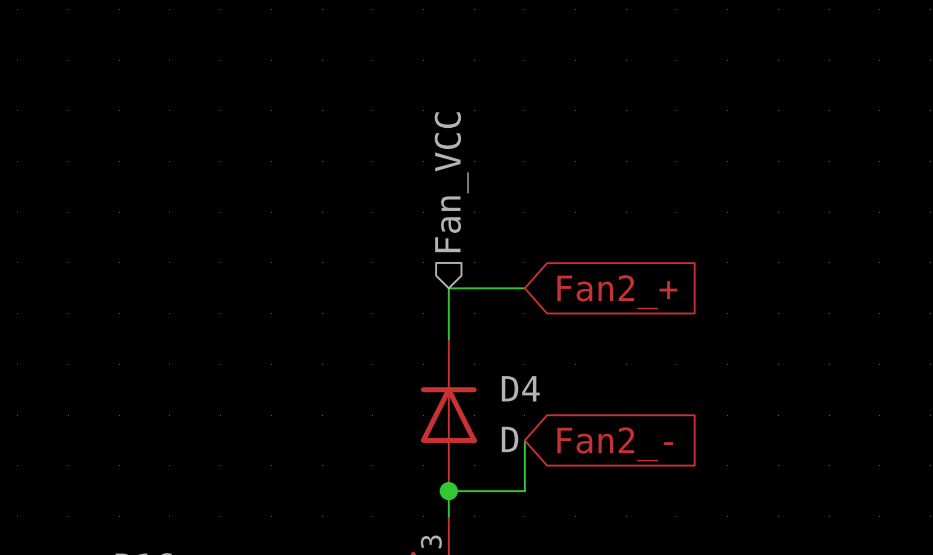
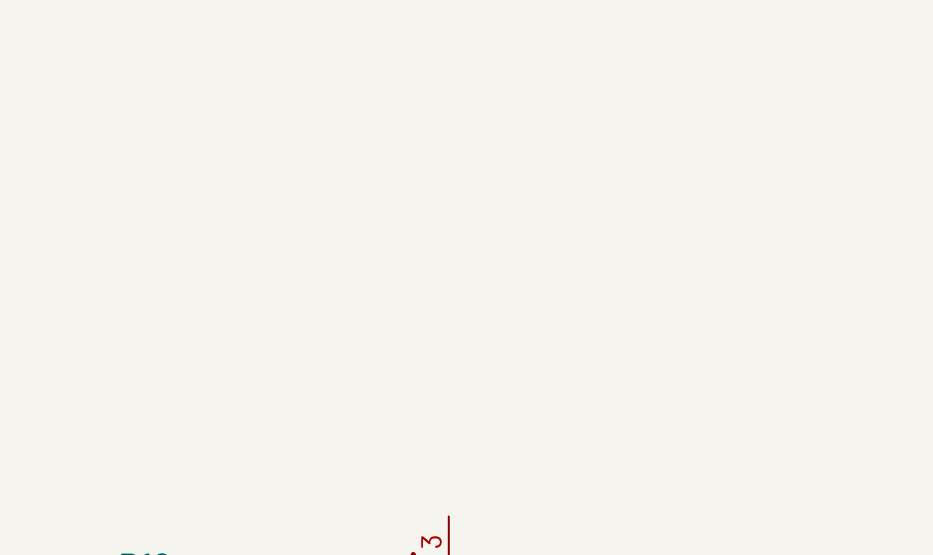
hierarchical label: Fan_VCC (451, 182) -> none
wire: (524, 288) (448, 288) (448, 339) -> none
global label: Fan2_+ (617, 292) -> none
D4: D (448, 415) -> none
wire: (524, 440) (524, 491) (448, 491) (448, 516) -> none
global label: Fan2_- (615, 444) -> none
junction: (448, 491) -> none

